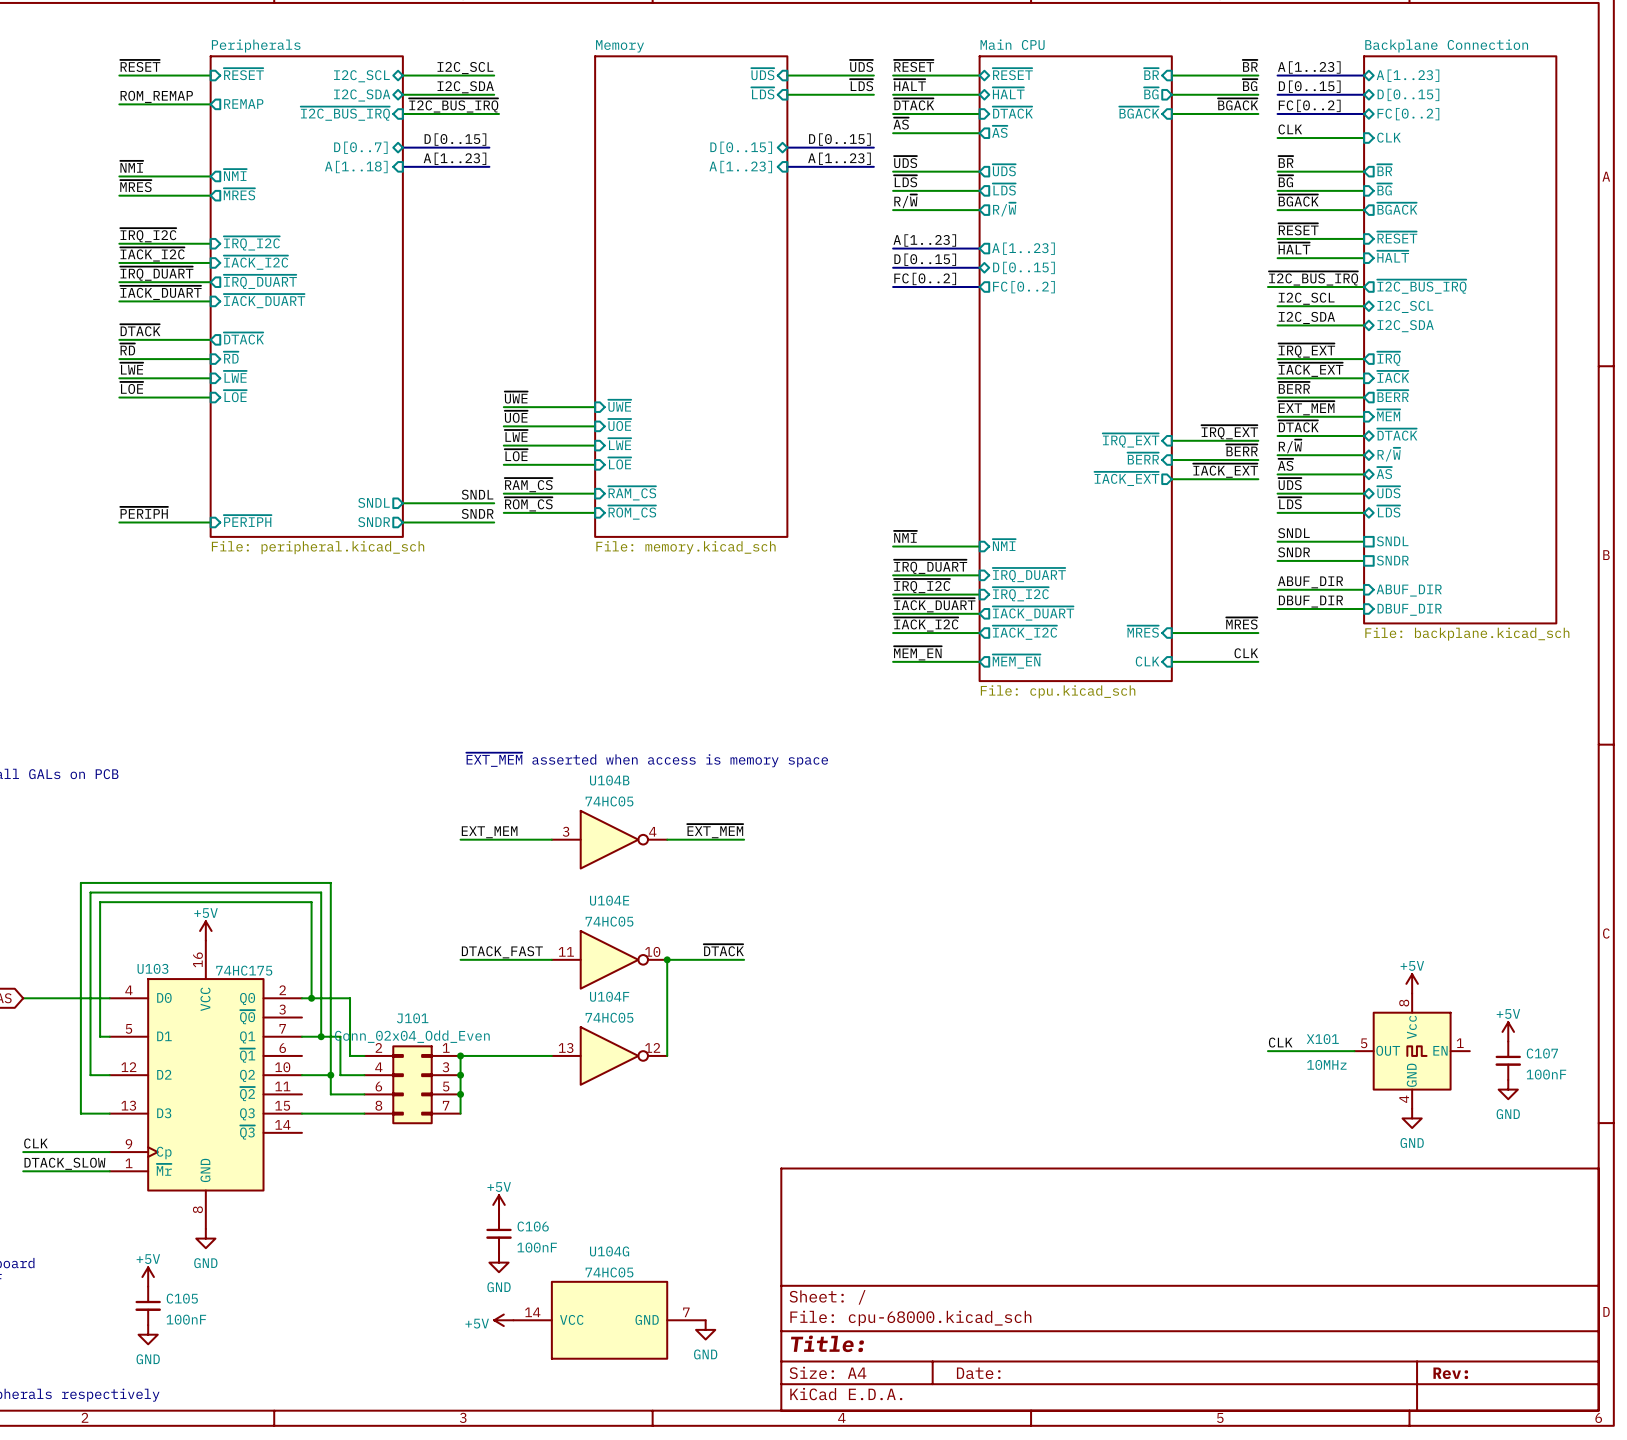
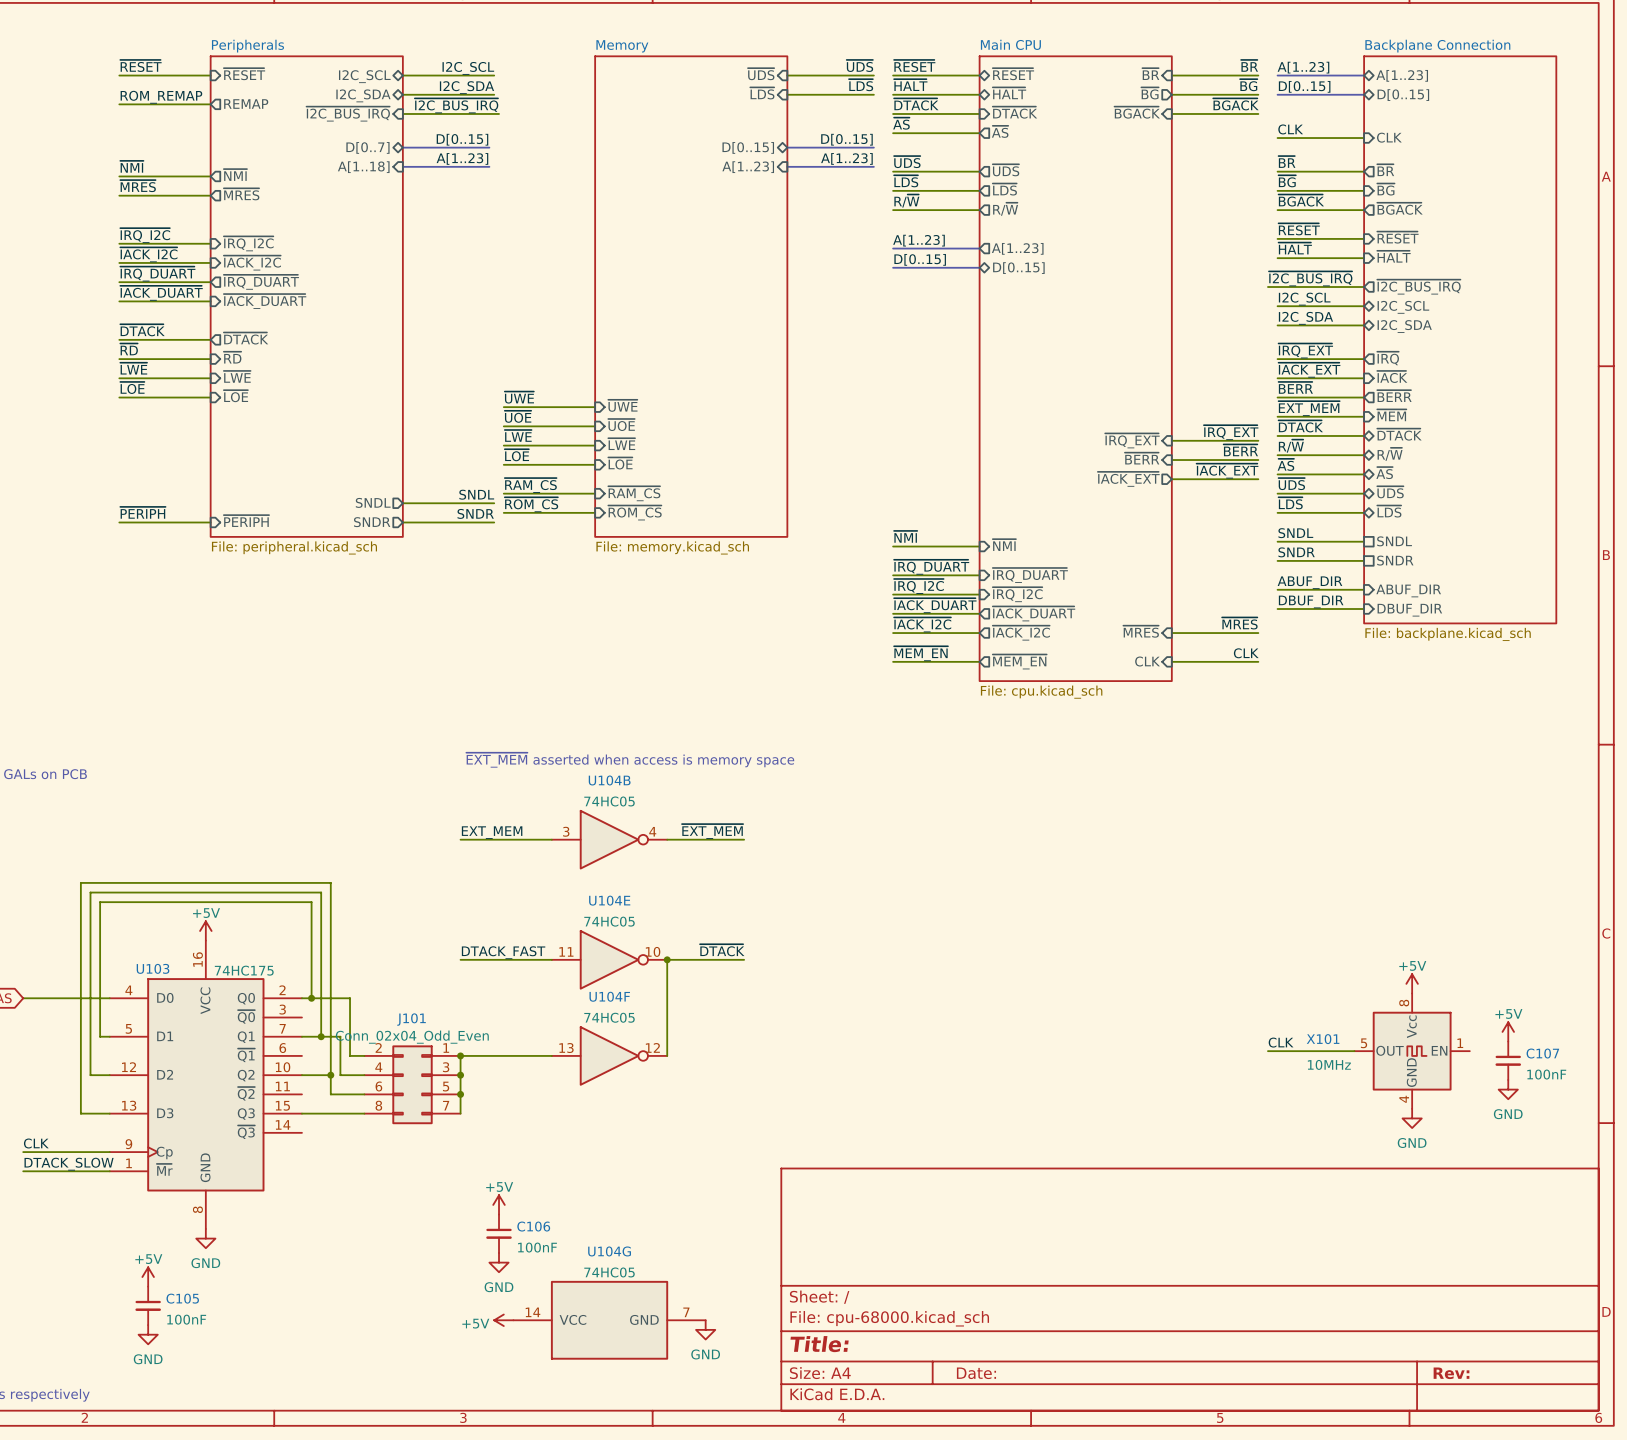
label: FC[0..2] (1309, 105) -> none
bus: (1277, 113) (1364, 113) -> none
sheet pin: FC[0..2] (1408, 114) -> none
label: FC[0..2] (925, 278) -> none
bus: (893, 287) (979, 287) -> none
sheet pin: FC[0..2] (1023, 287) -> none

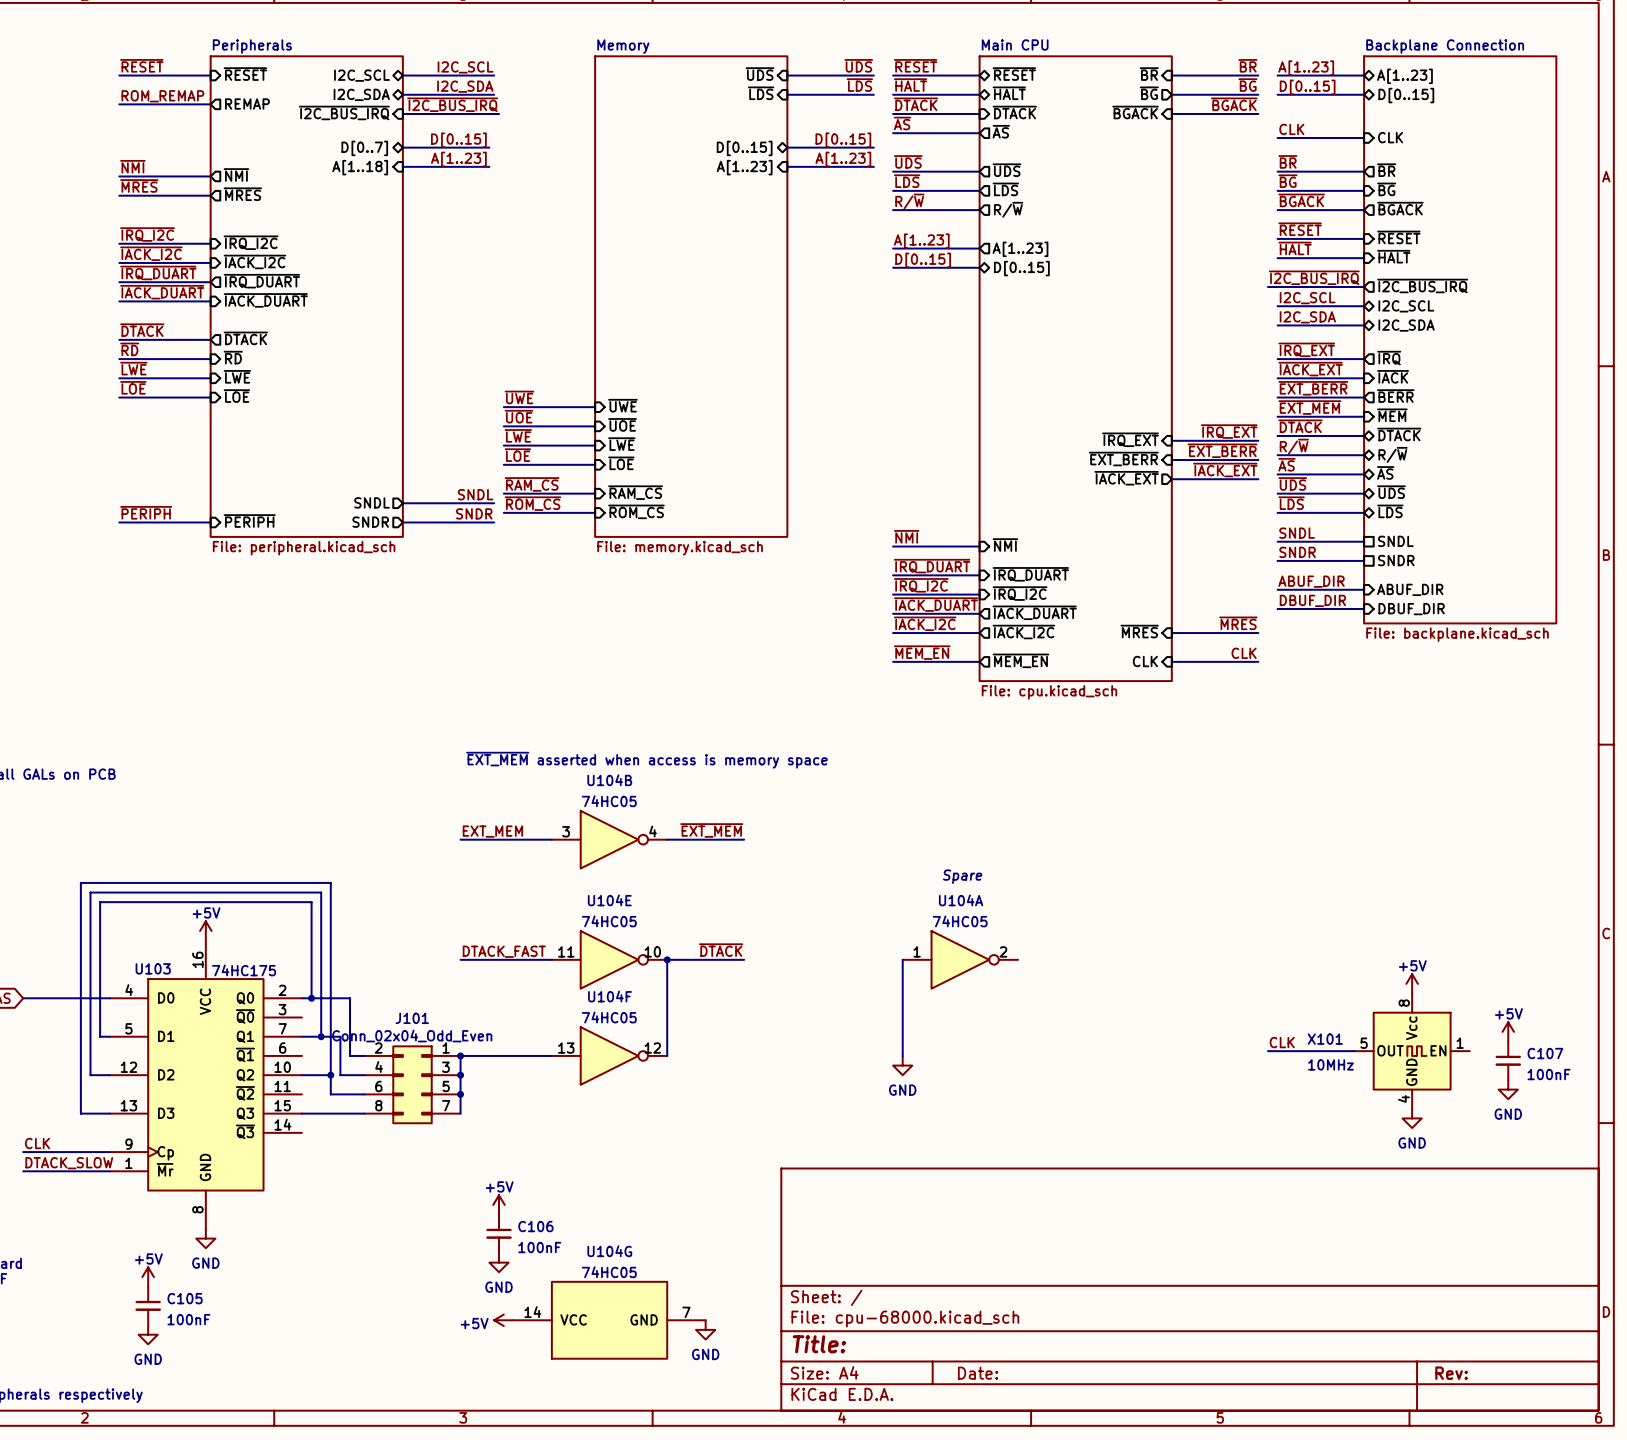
label: ~{BERR} (1295, 387) -> ~{EXT_BERR} (1313, 388)
label: ~{BERR} (1240, 450) -> ~{EXT_BERR} (1222, 450)
sheet pin: ~{BERR} (1142, 458) -> ~{EXT_BERR} (1123, 459)
text: none -> Spare (962, 876)
wire: none -> (902, 959) (902, 1055)
U104A: none -> 74HC05 (960, 959)
power symbol: none -> GND (902, 1065)

